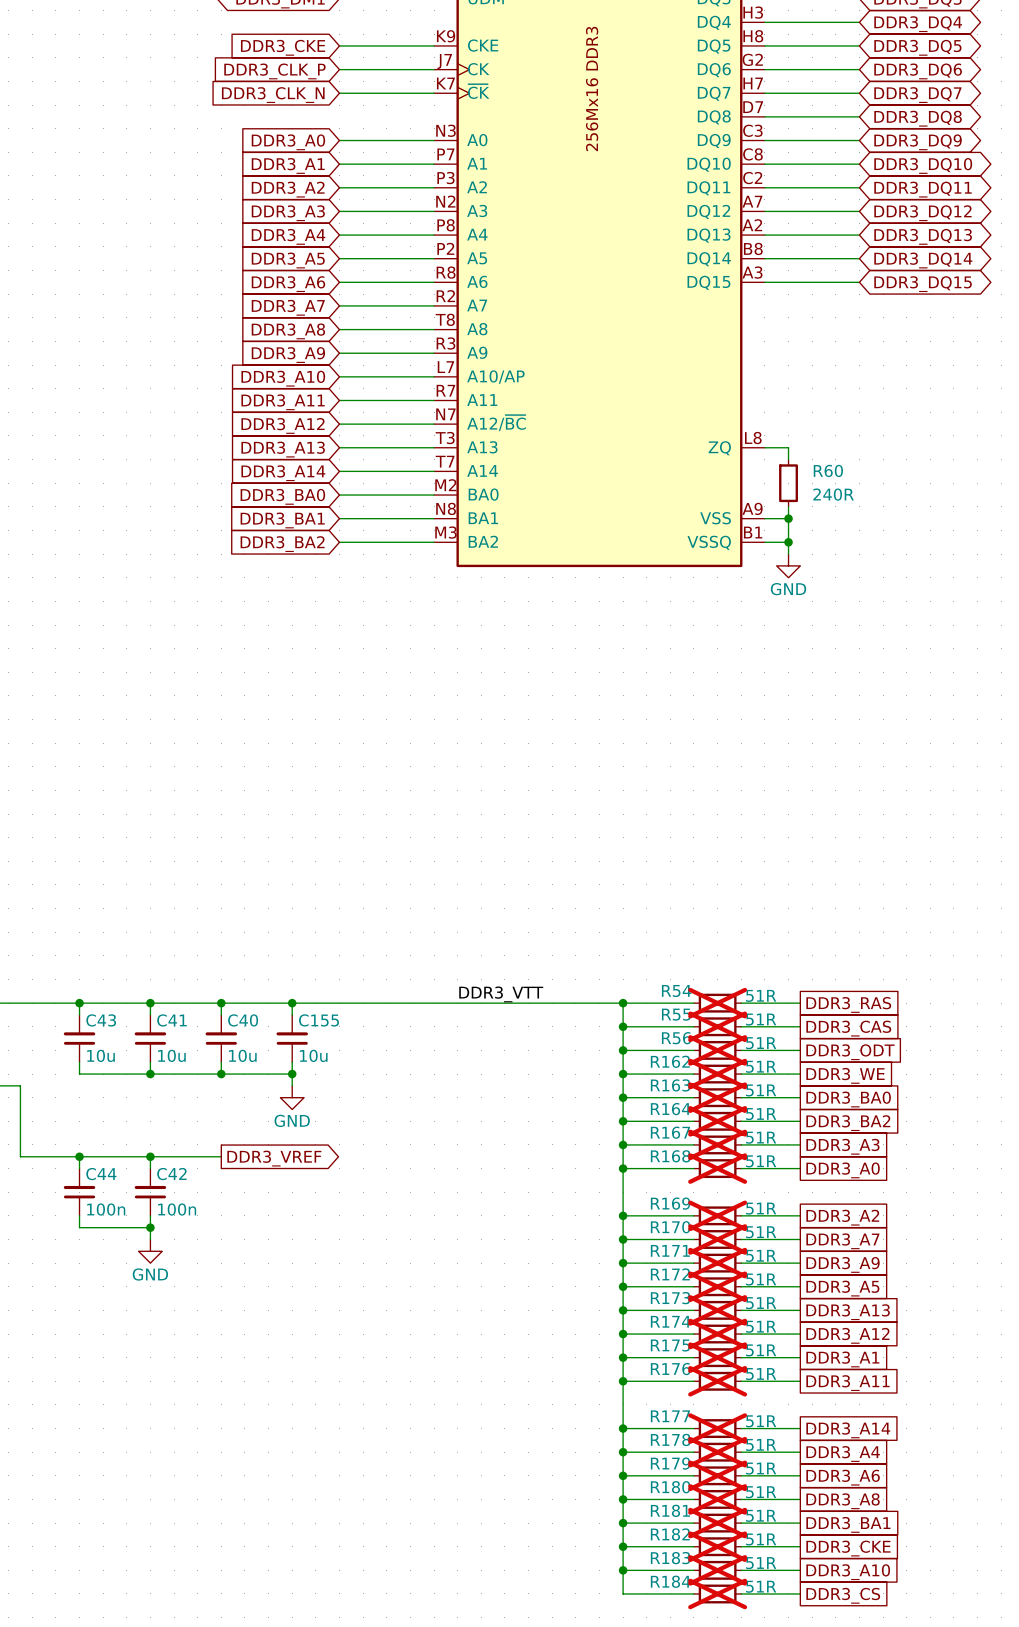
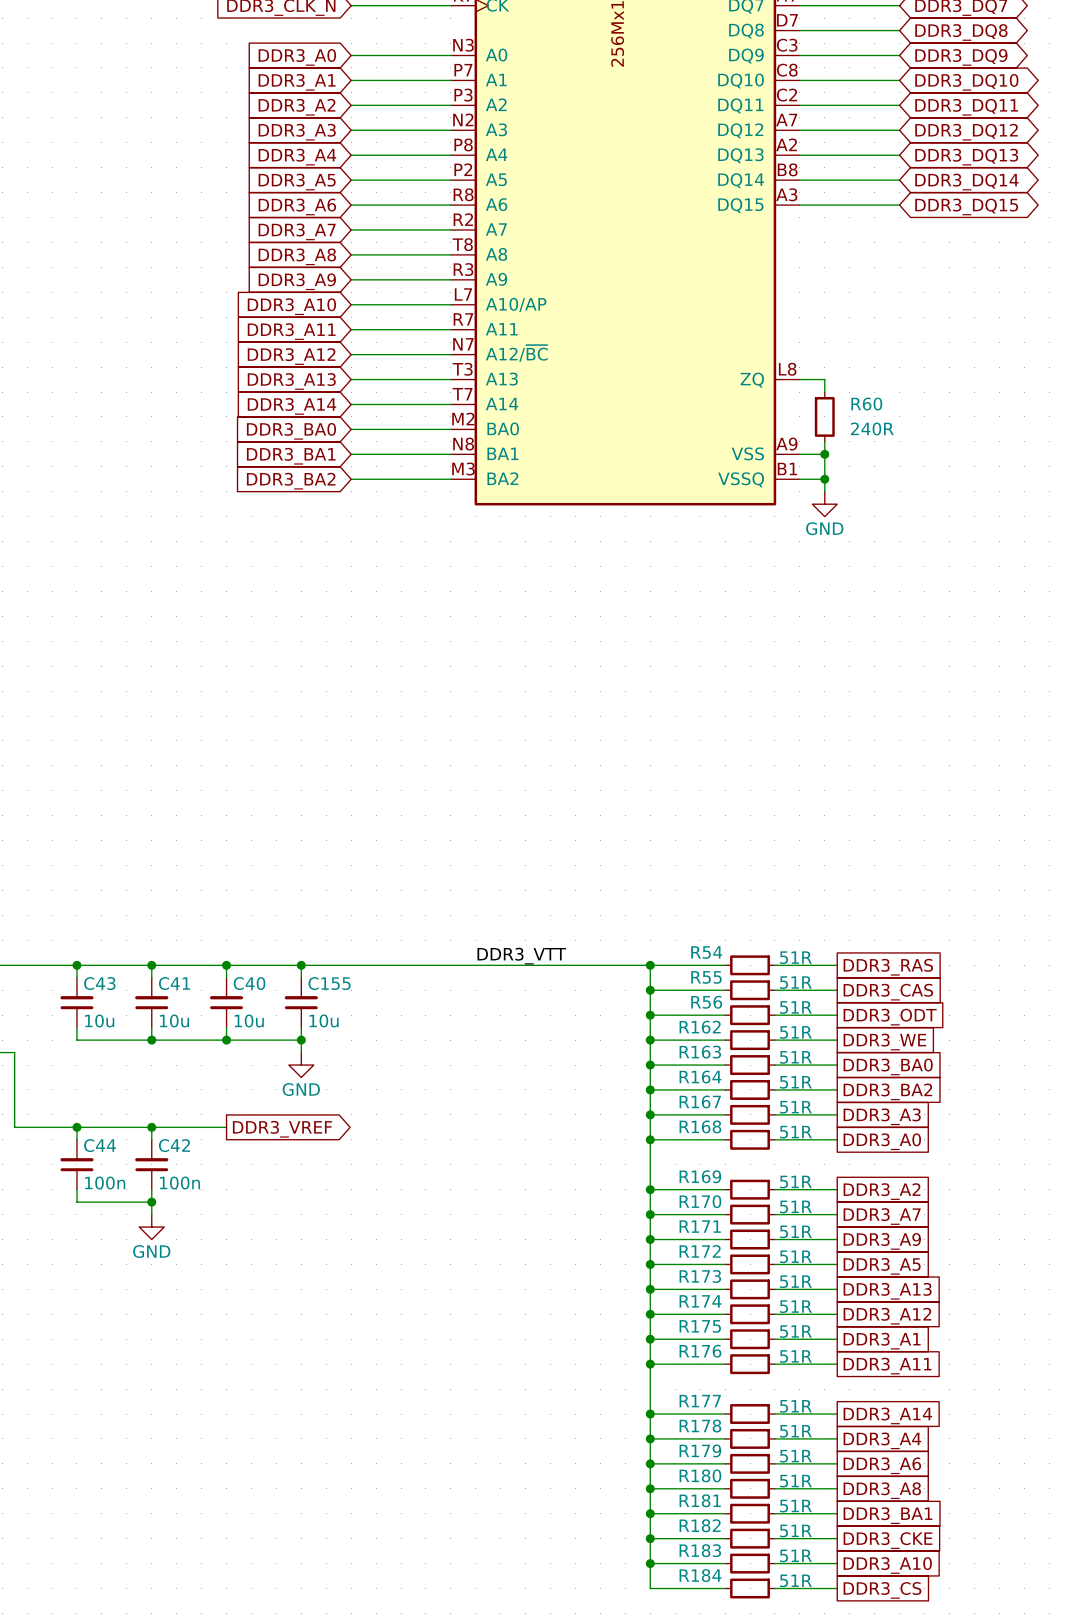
R54 do-not-place cross: (717, 1003) -> none
R55 do-not-place cross: (717, 1026) -> none
R56 do-not-place cross: (717, 1050) -> none
R162 do-not-place cross: (717, 1074) -> none
R163 do-not-place cross: (717, 1097) -> none
R164 do-not-place cross: (717, 1121) -> none
R167 do-not-place cross: (717, 1144) -> none
R168 do-not-place cross: (717, 1168) -> none
R169 do-not-place cross: (717, 1215) -> none
R170 do-not-place cross: (717, 1239) -> none
R171 do-not-place cross: (717, 1263) -> none
R172 do-not-place cross: (717, 1286) -> none
R173 do-not-place cross: (717, 1310) -> none
R174 do-not-place cross: (717, 1334) -> none
R175 do-not-place cross: (717, 1357) -> none
R176 do-not-place cross: (717, 1381) -> none
R177 do-not-place cross: (717, 1428) -> none
R178 do-not-place cross: (717, 1452) -> none
R179 do-not-place cross: (717, 1475) -> none
R180 do-not-place cross: (717, 1499) -> none
R181 do-not-place cross: (717, 1523) -> none
R182 do-not-place cross: (717, 1546) -> none
R183 do-not-place cross: (717, 1570) -> none
R184 do-not-place cross: (717, 1593) -> none

